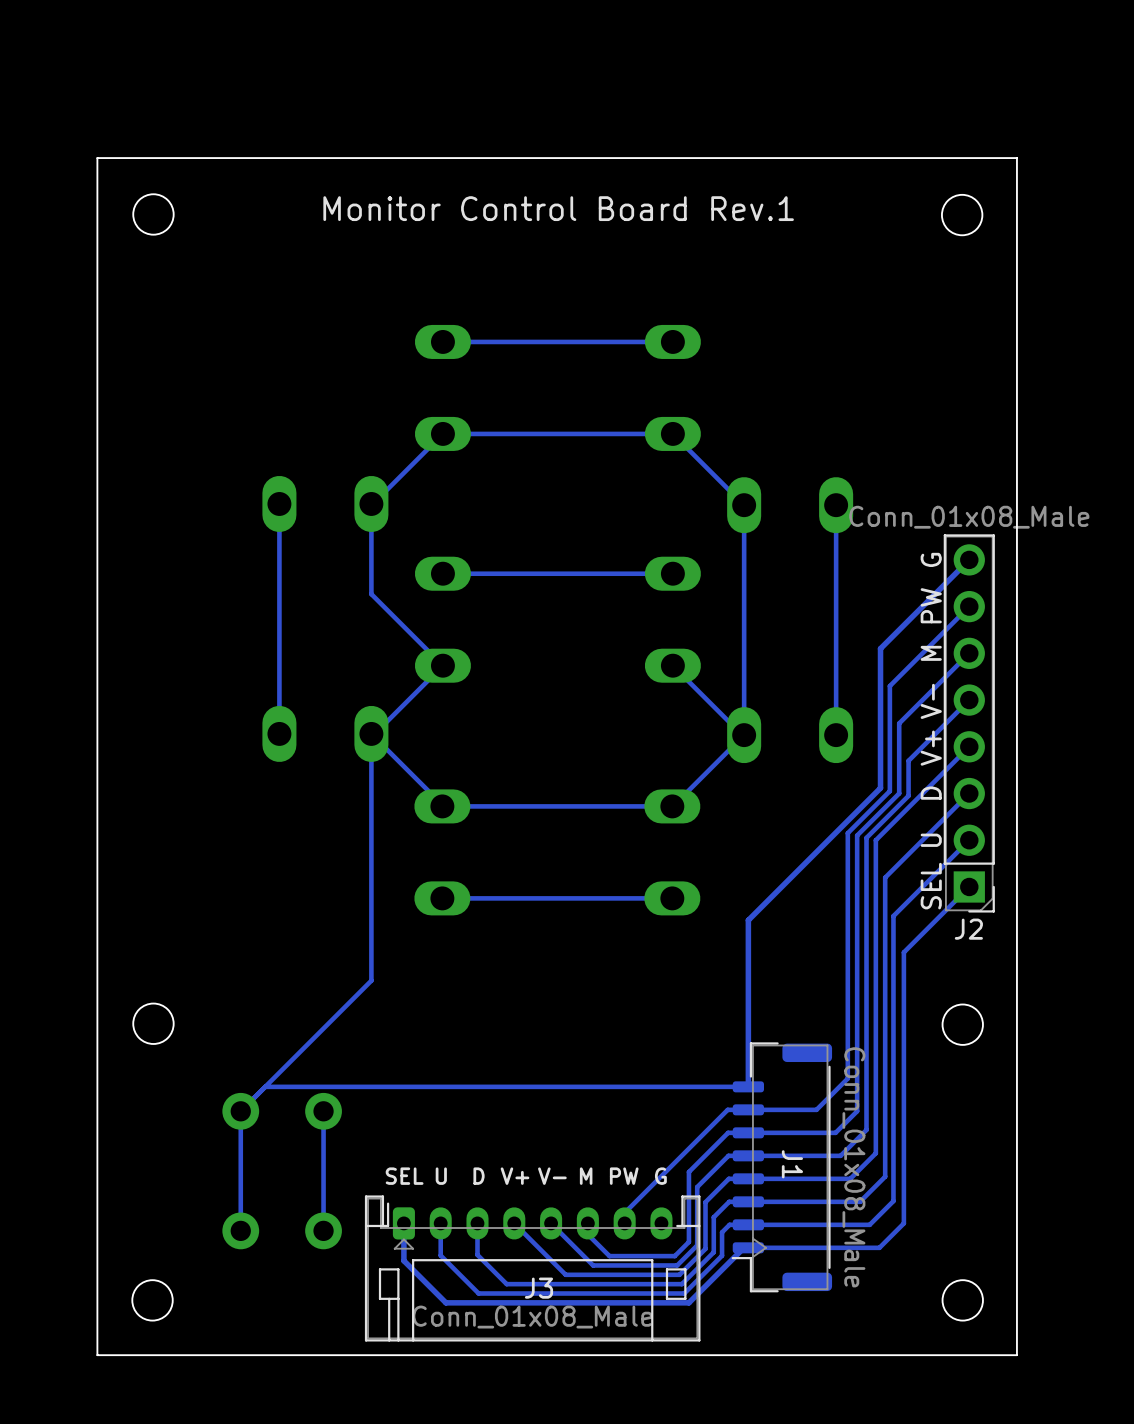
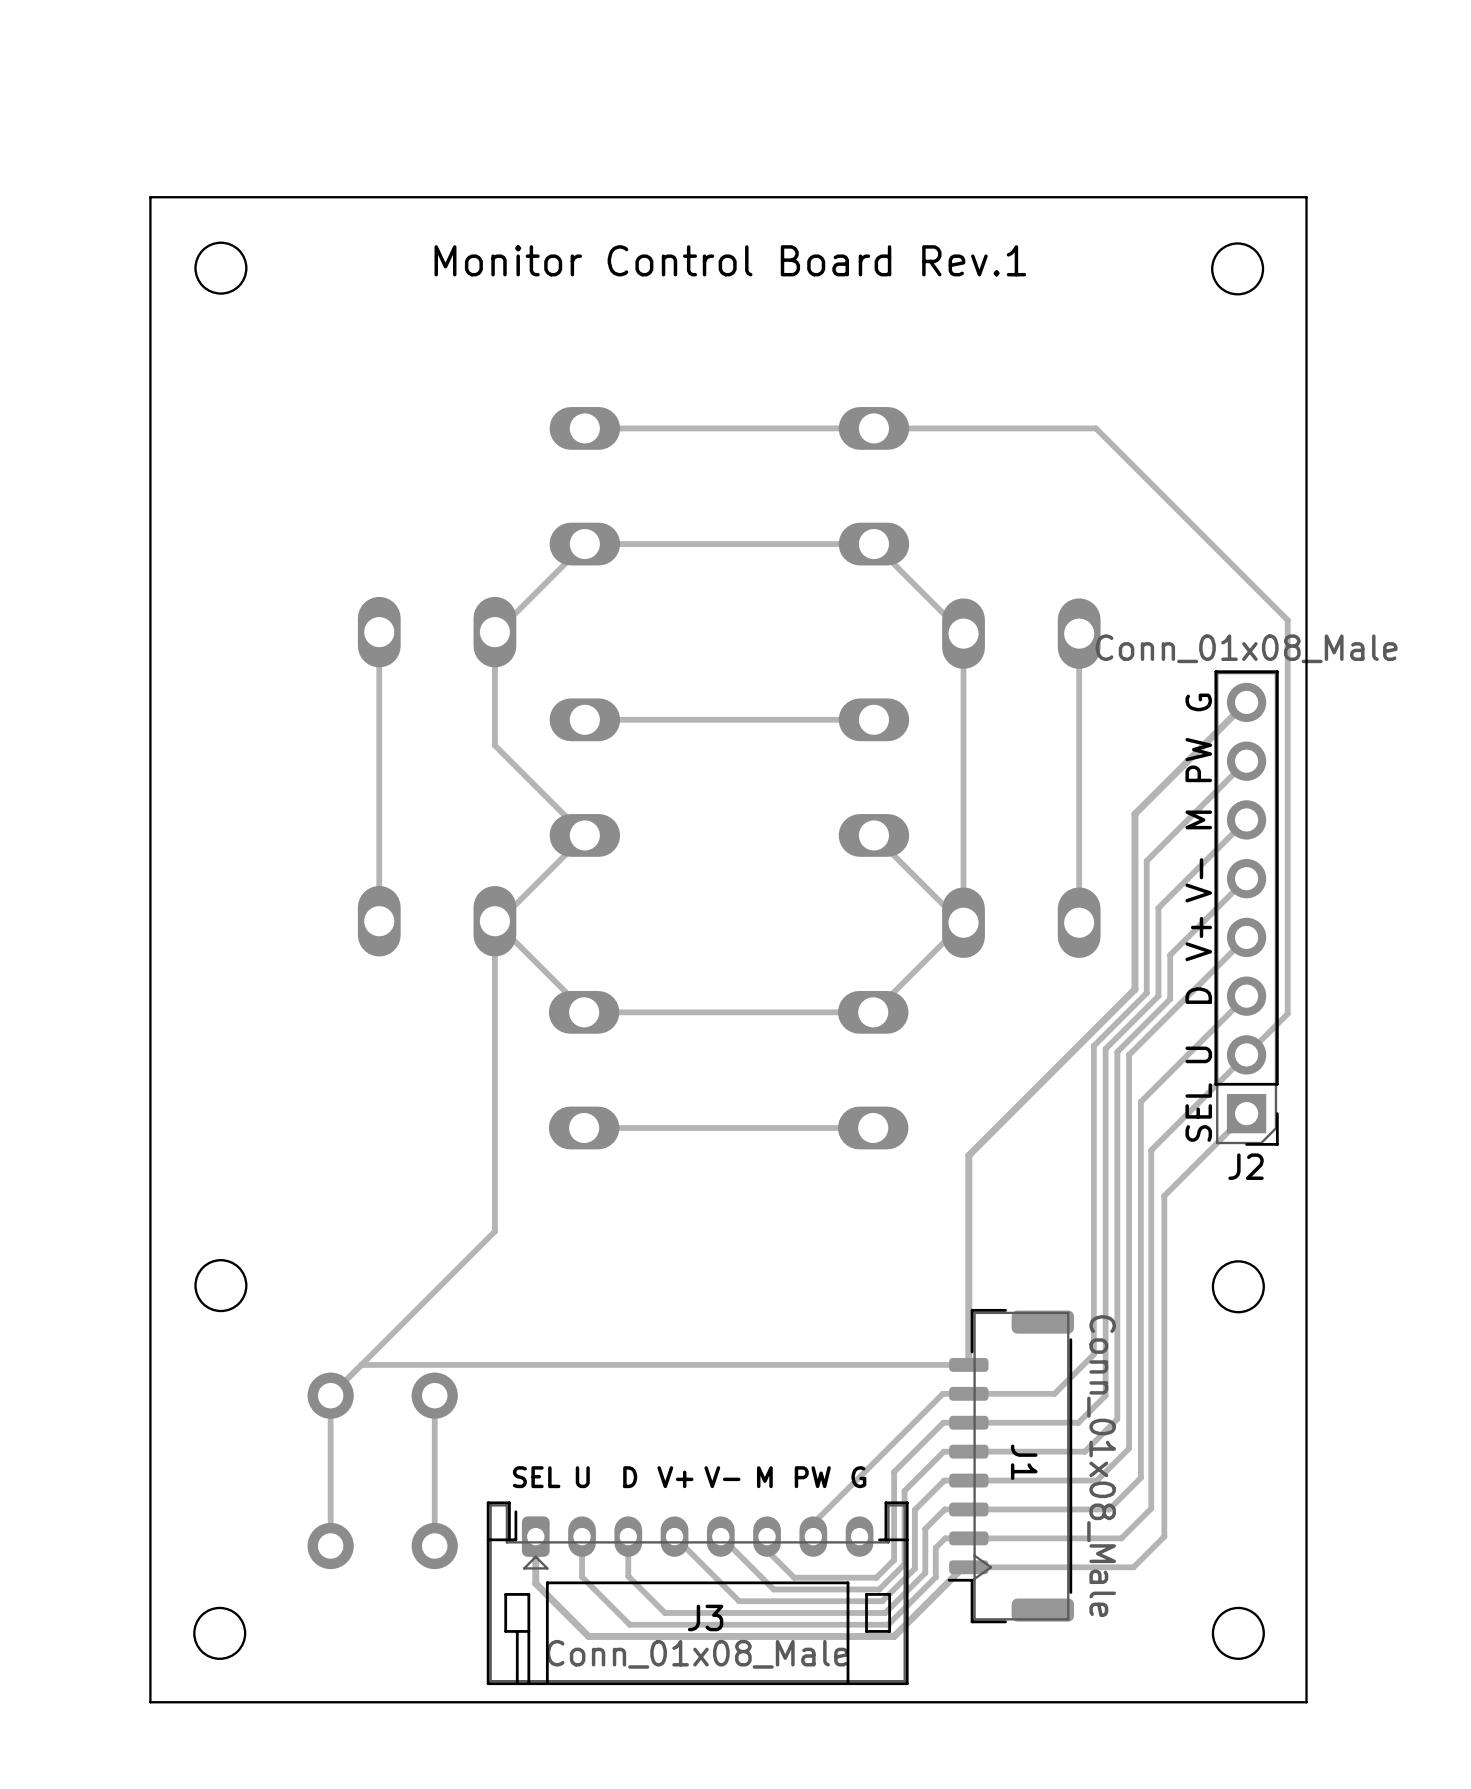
track: none -> (873, 428) (1095, 428) (1287, 620) (1287, 1013) (1246, 1054)

